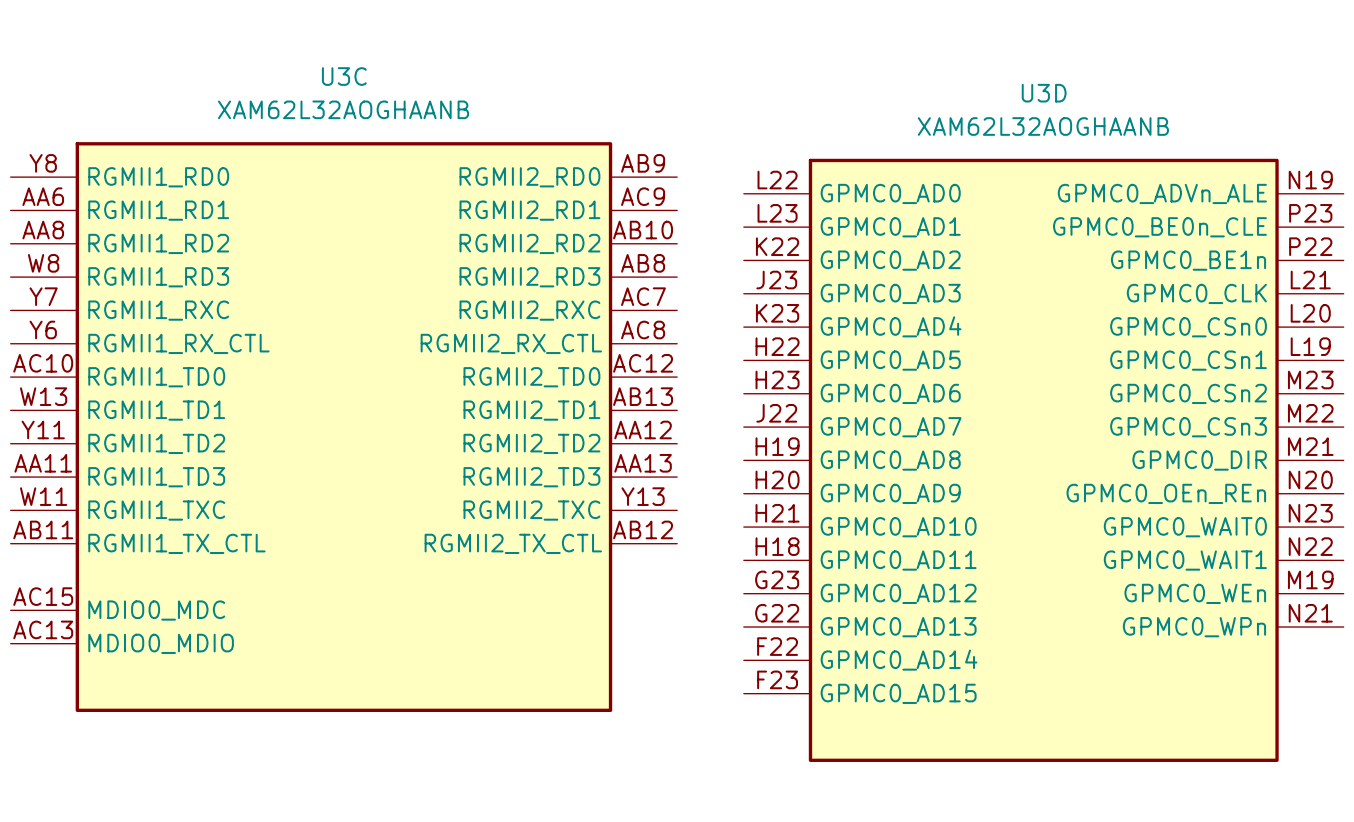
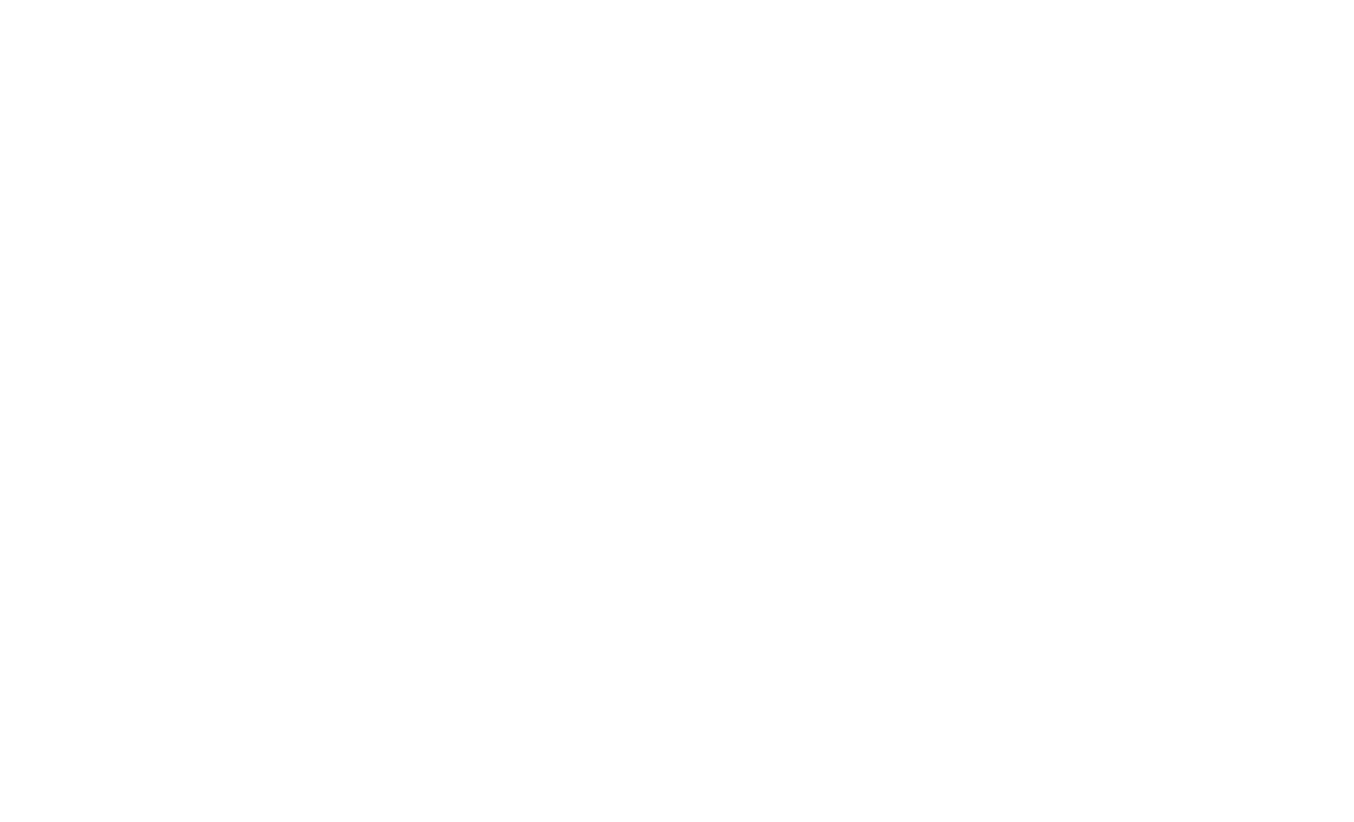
U3C: XAM62L32AOGHAANB (343, 427) -> none
U3D: XAM62L32AOGHAANB (1043, 460) -> none

